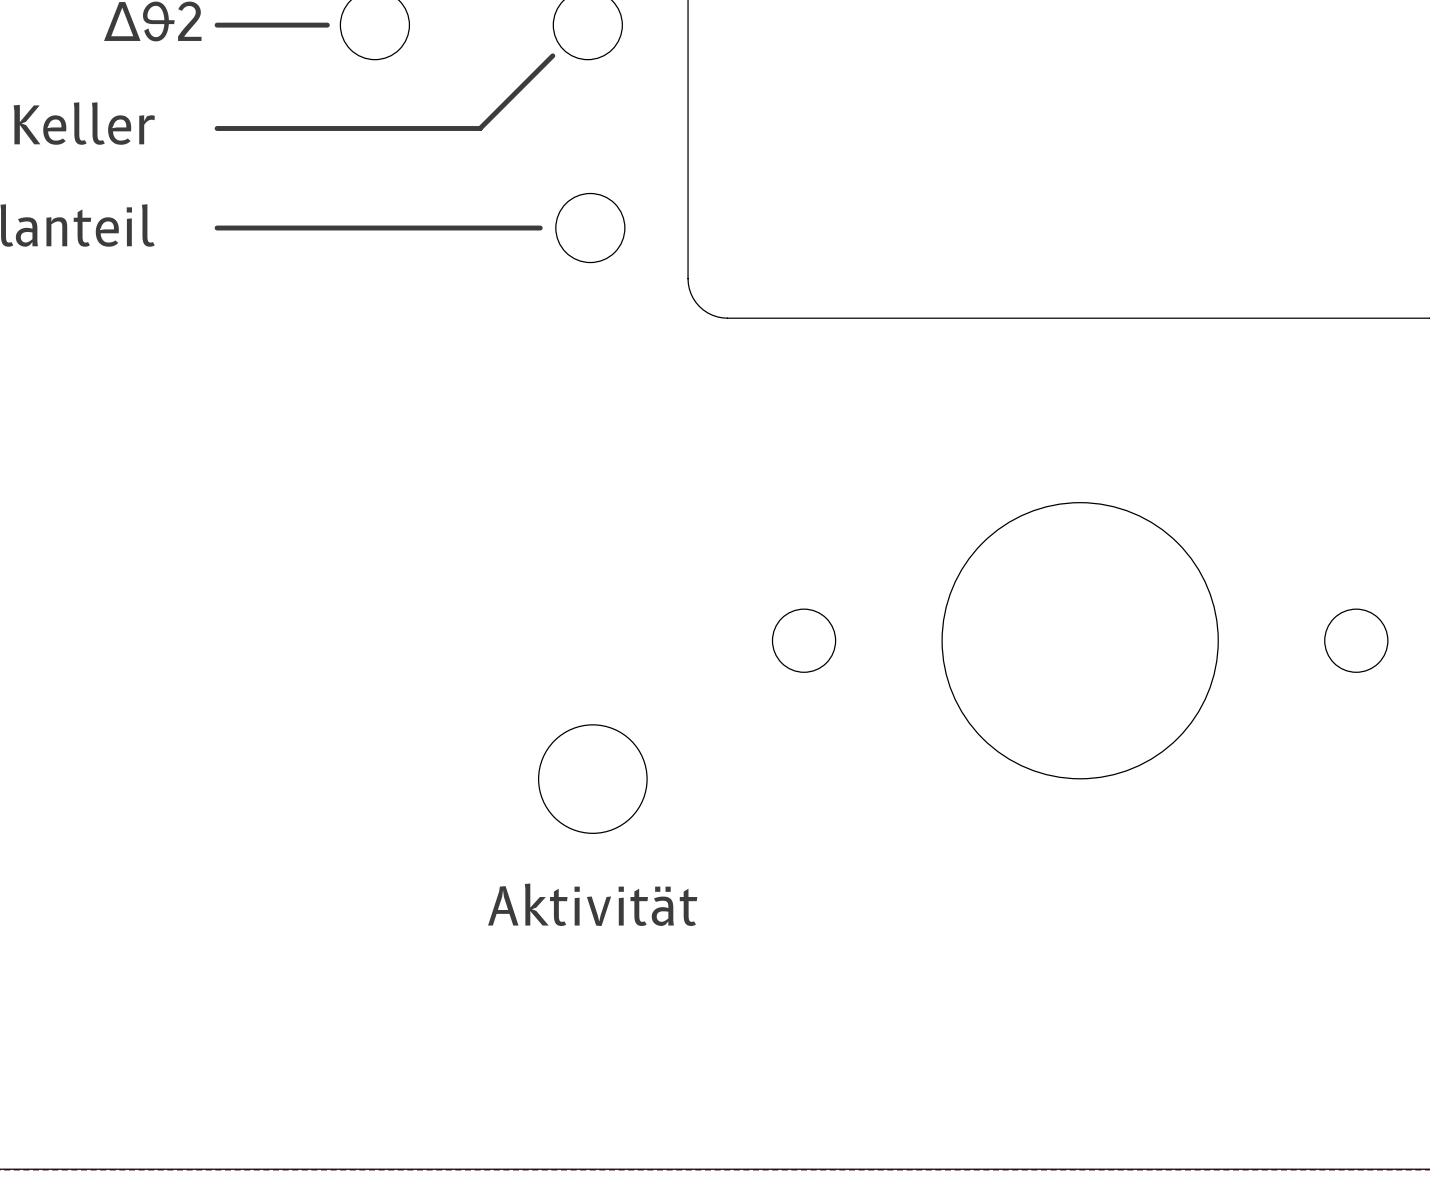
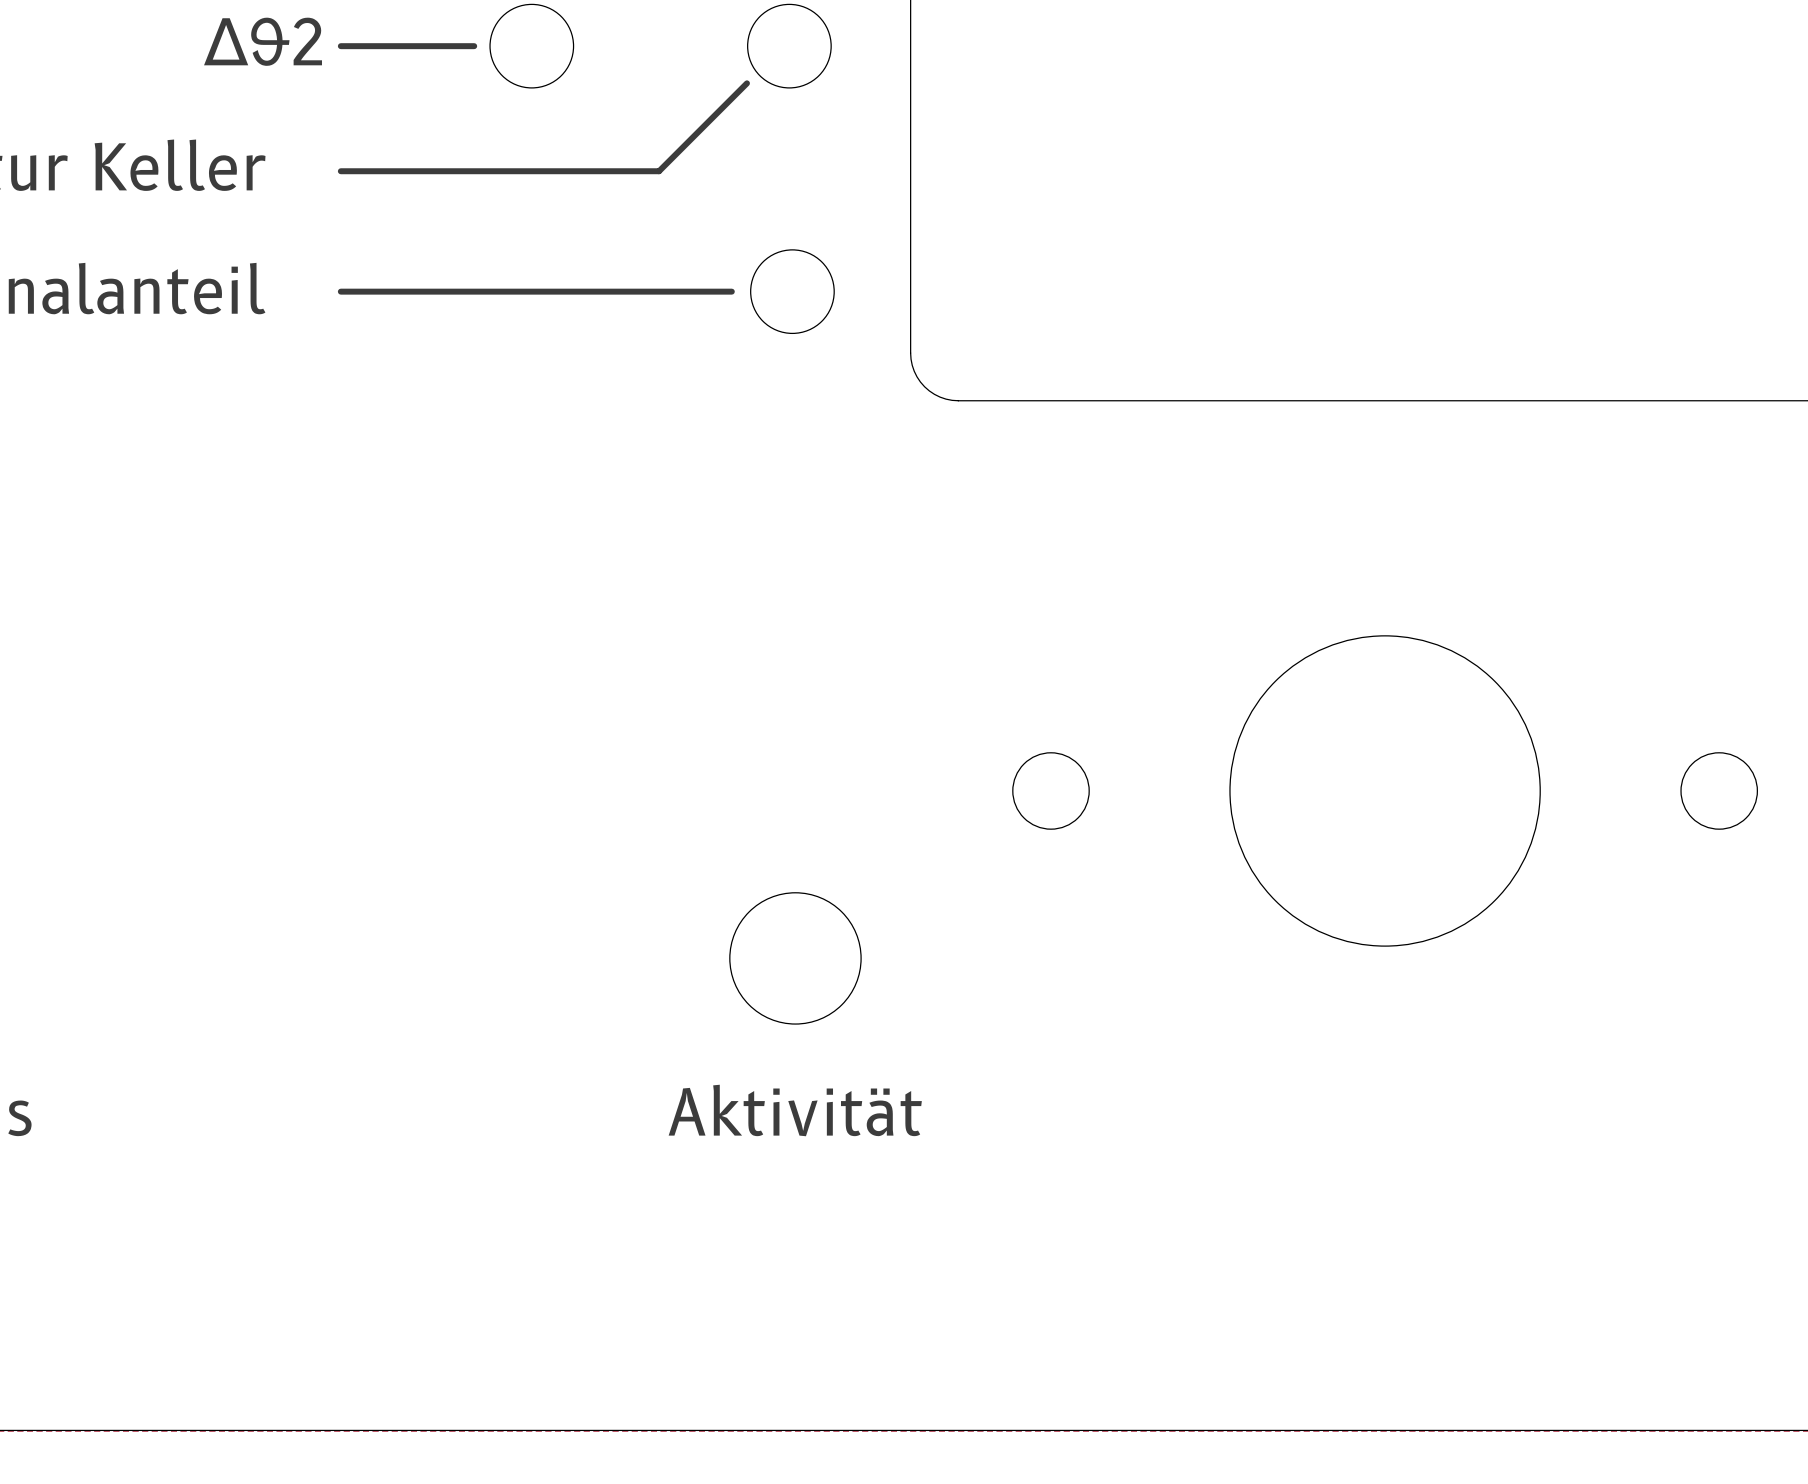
round board edge size: [941, 502, 1219, 780] -> [1229, 635, 1541, 947]

